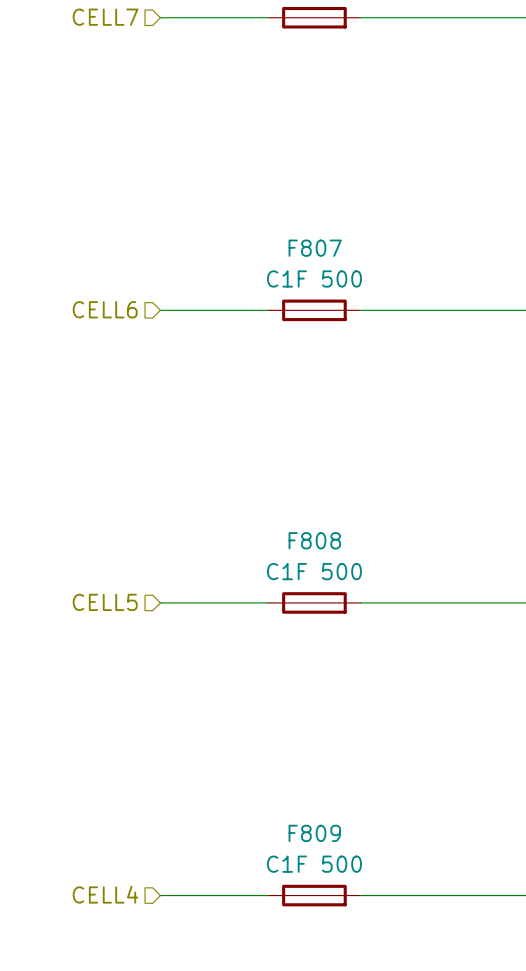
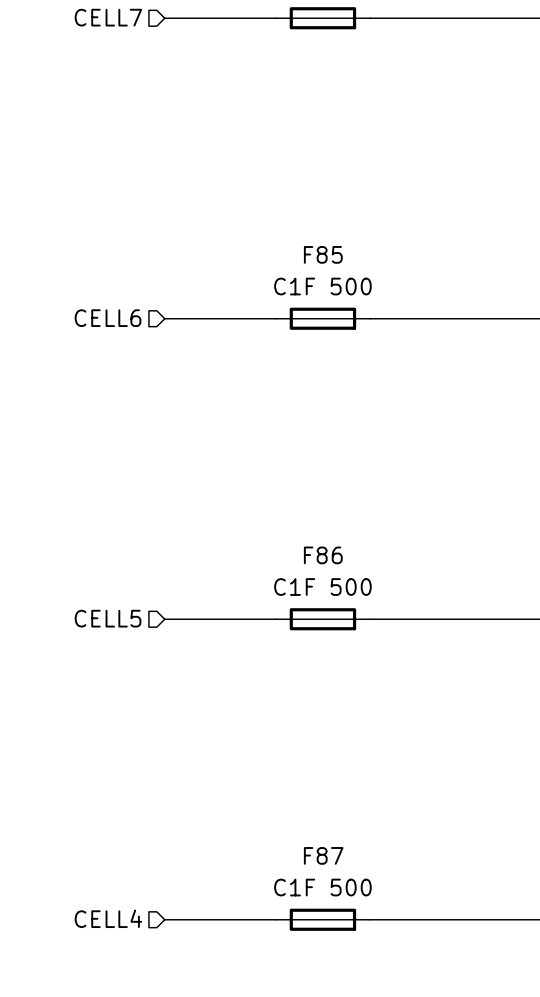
F807 name: F807 (315, 248) -> F85 (323, 254)
F808 name: F808 (314, 540) -> F86 (323, 555)
F809 name: F809 (314, 833) -> F87 (323, 855)

